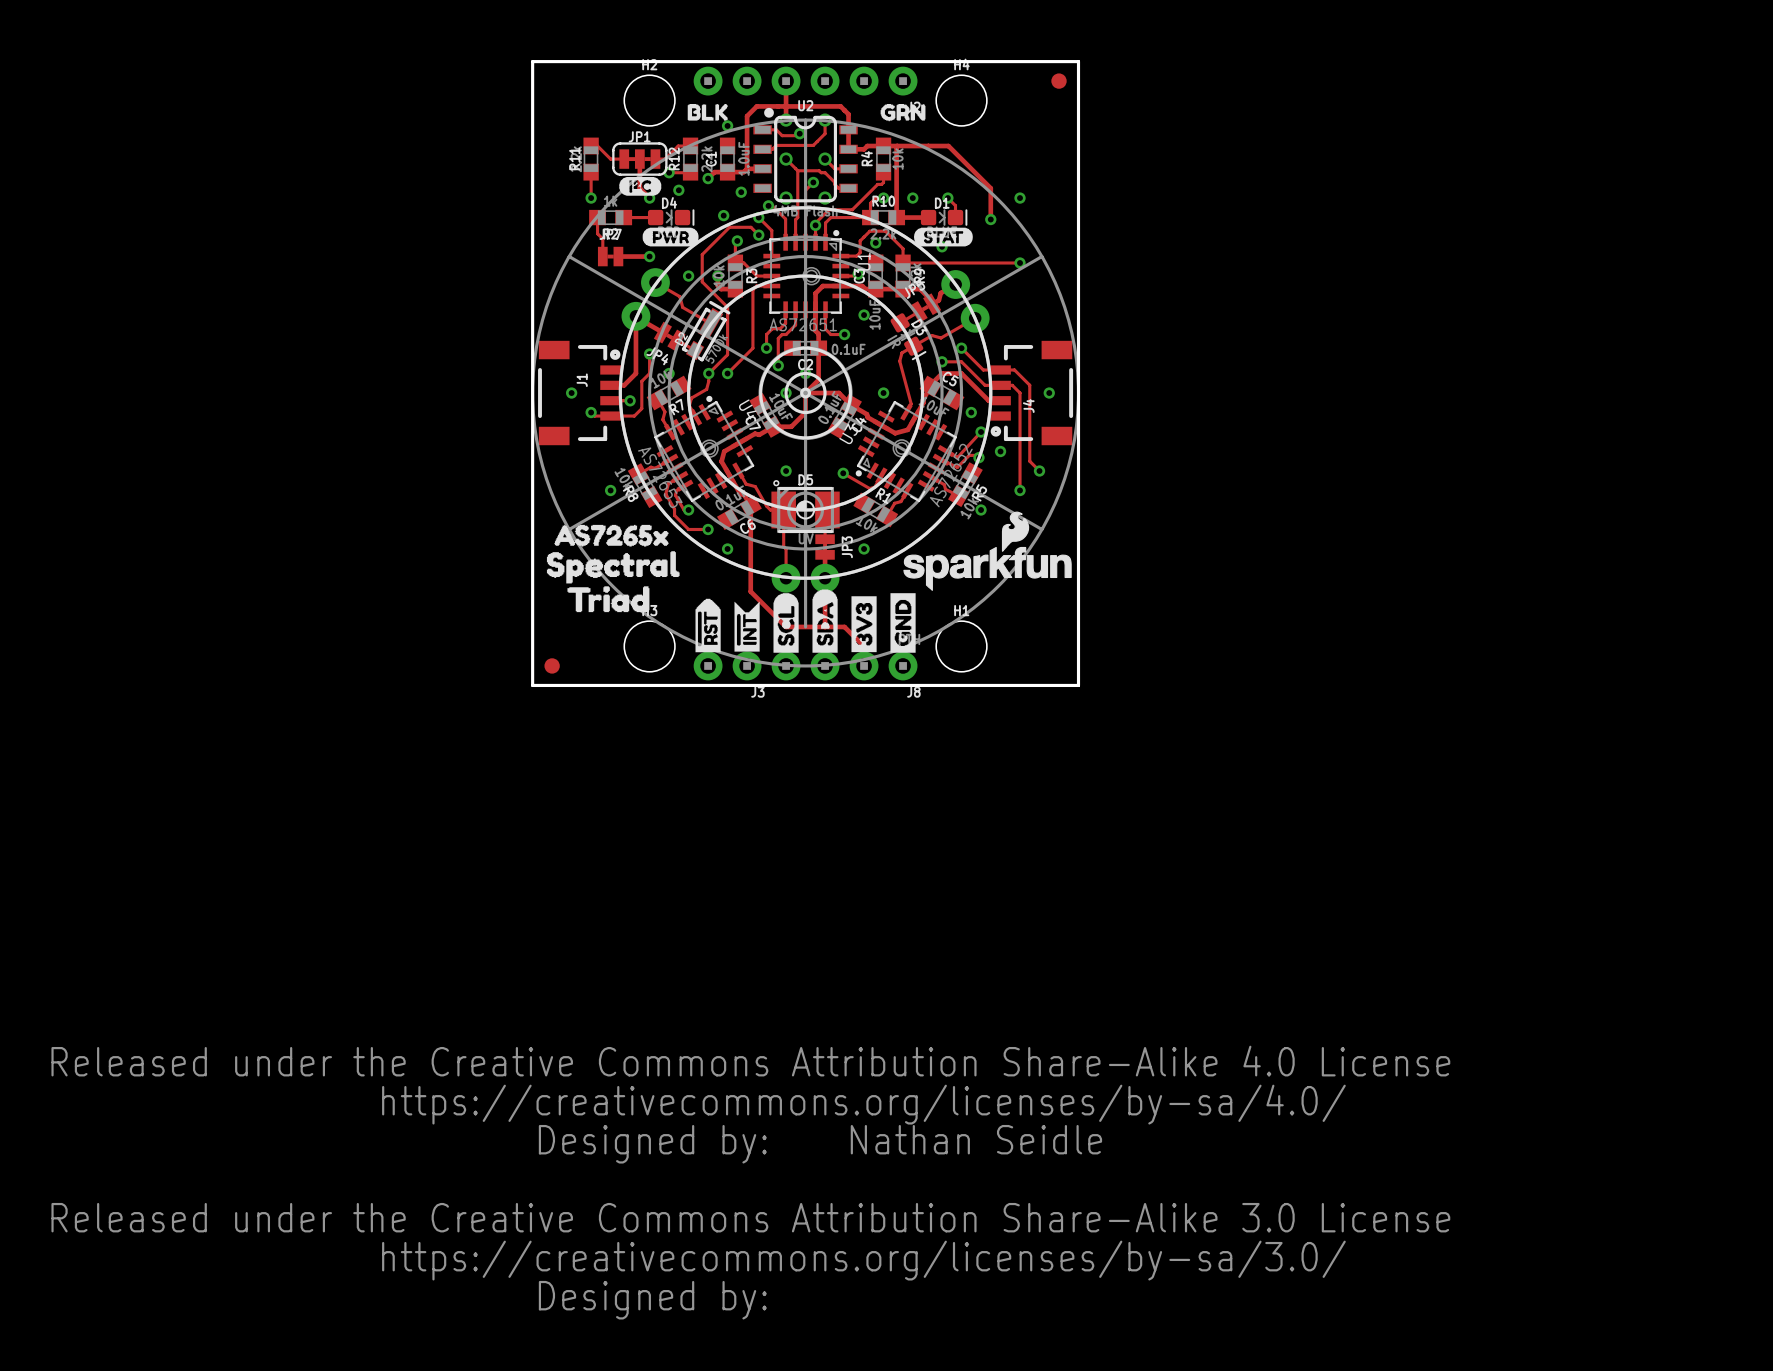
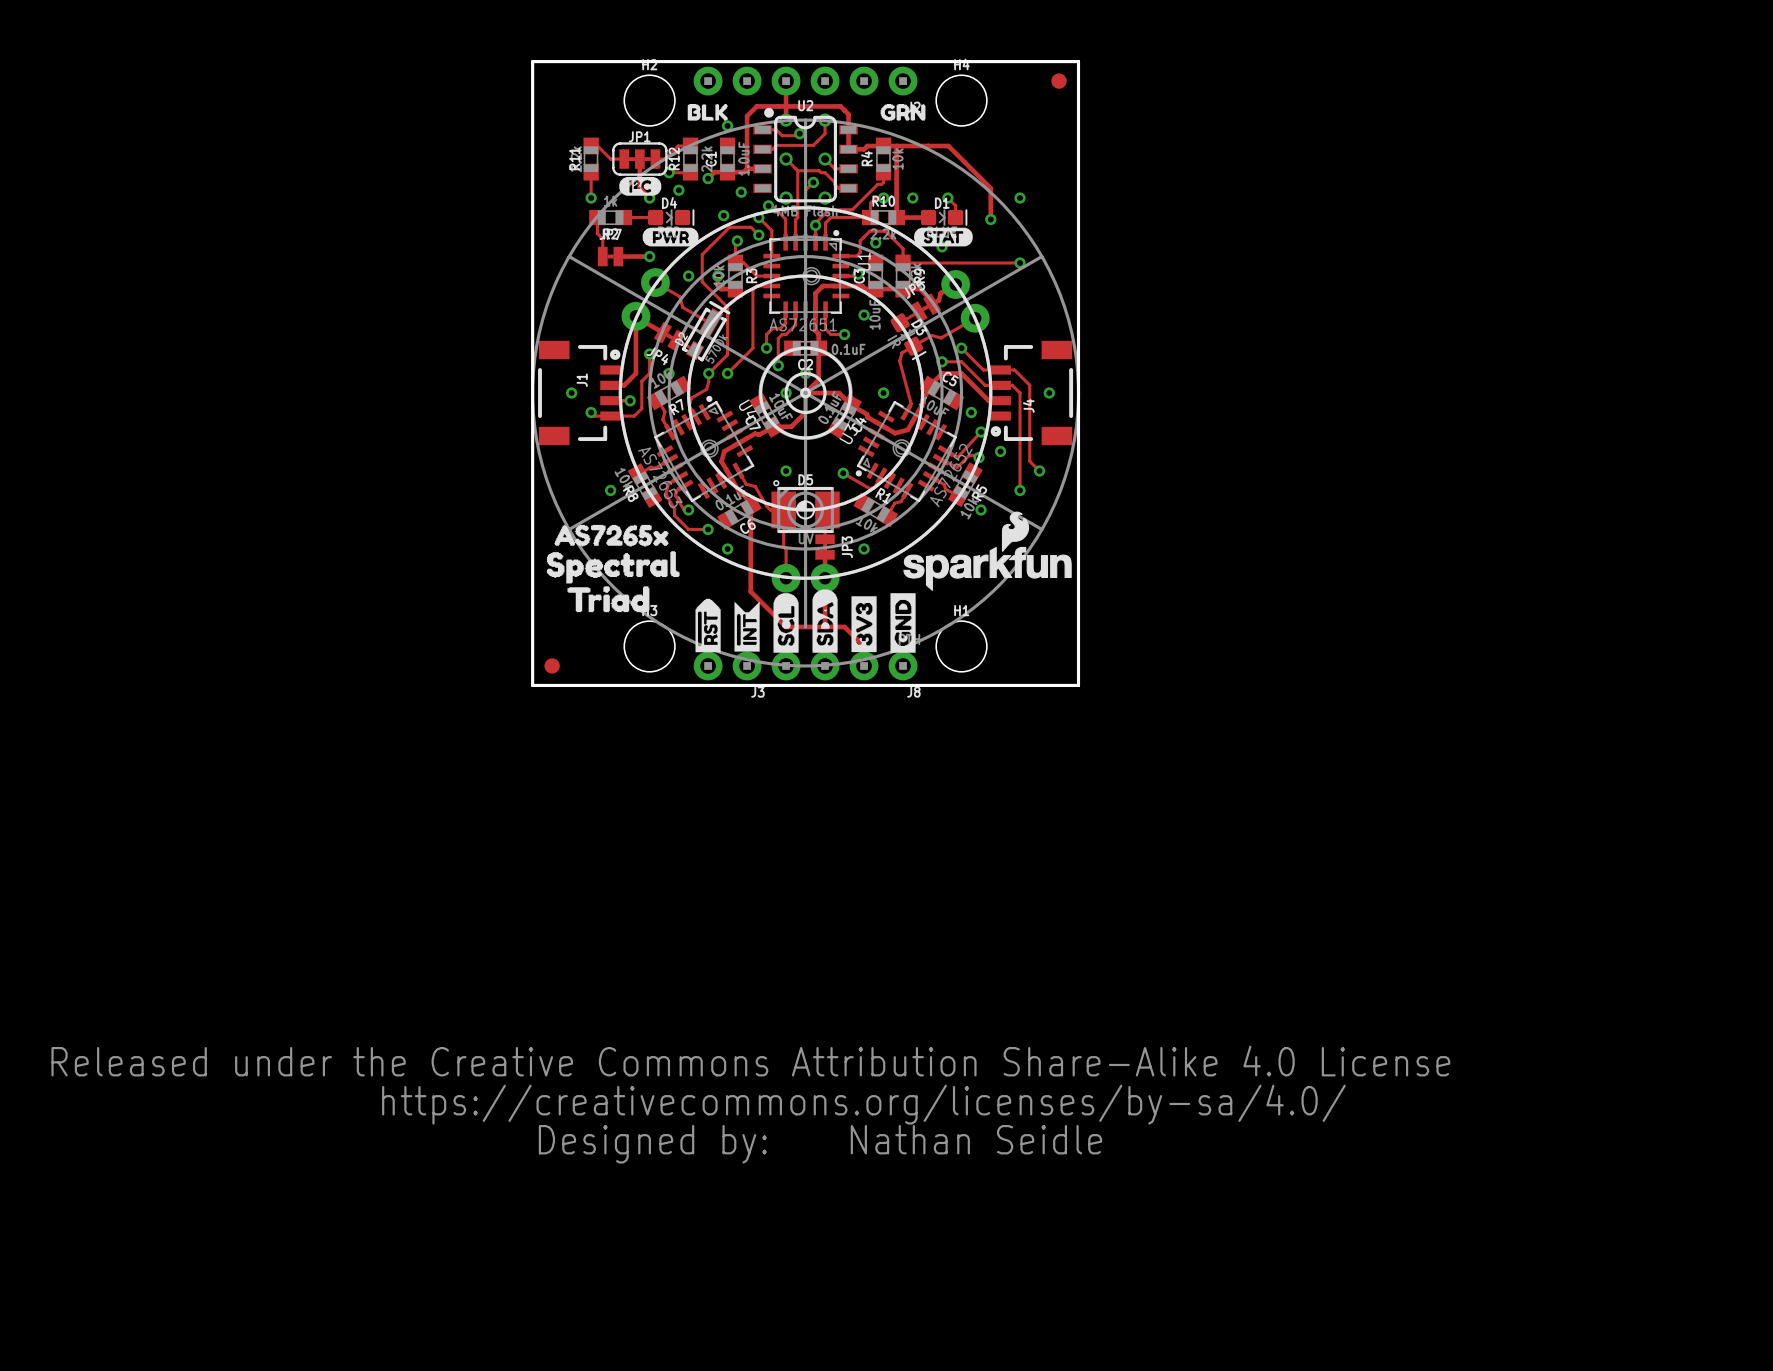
drawing: [51, 1202, 1451, 1320] -> none

